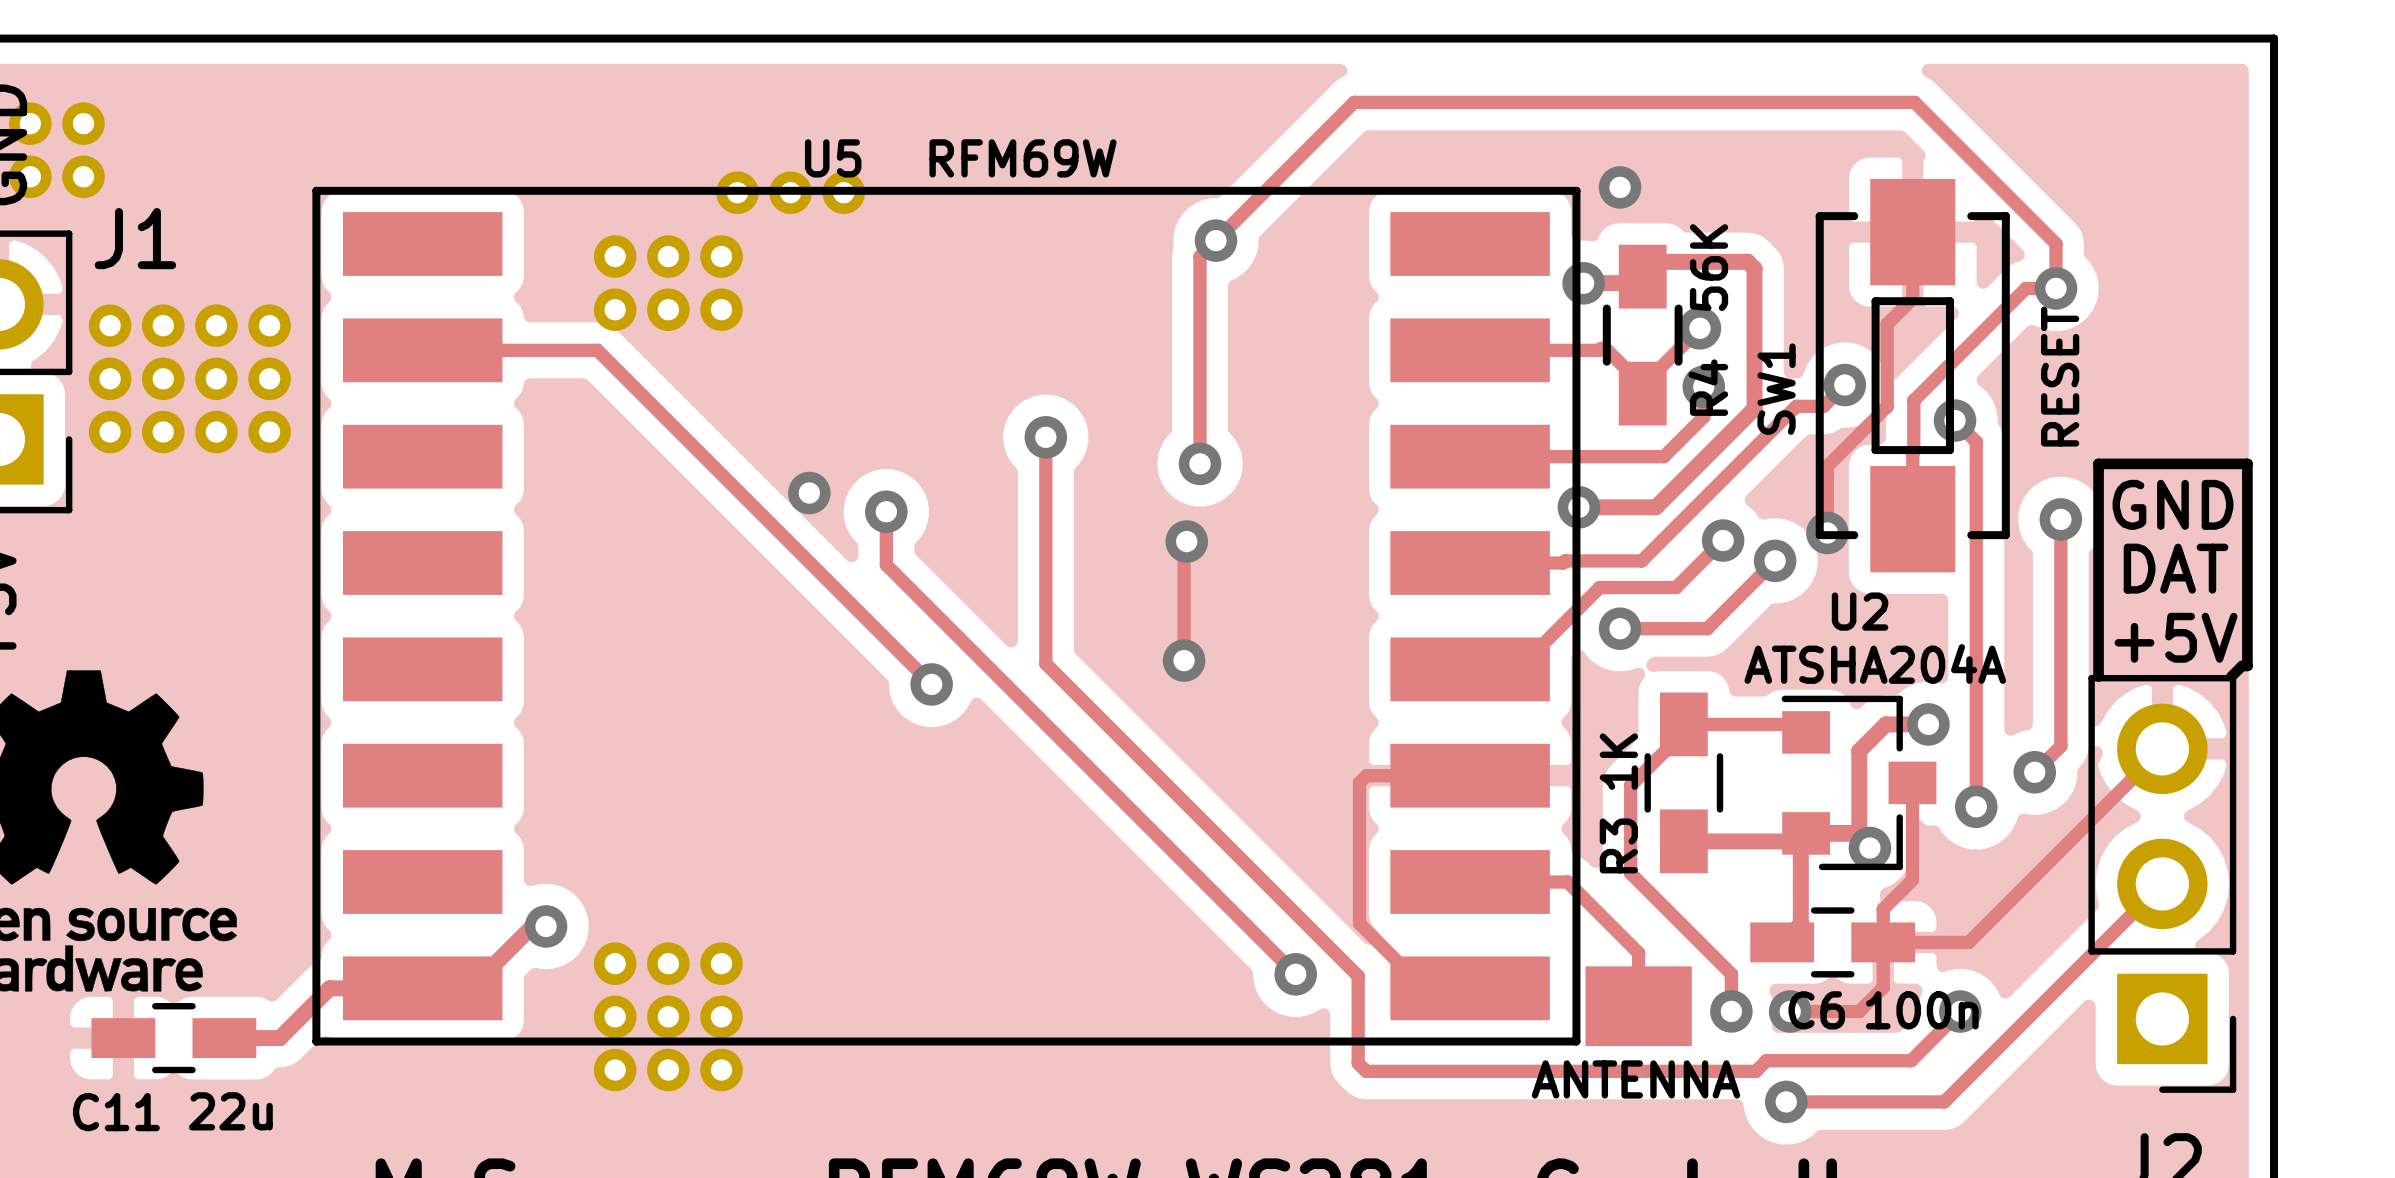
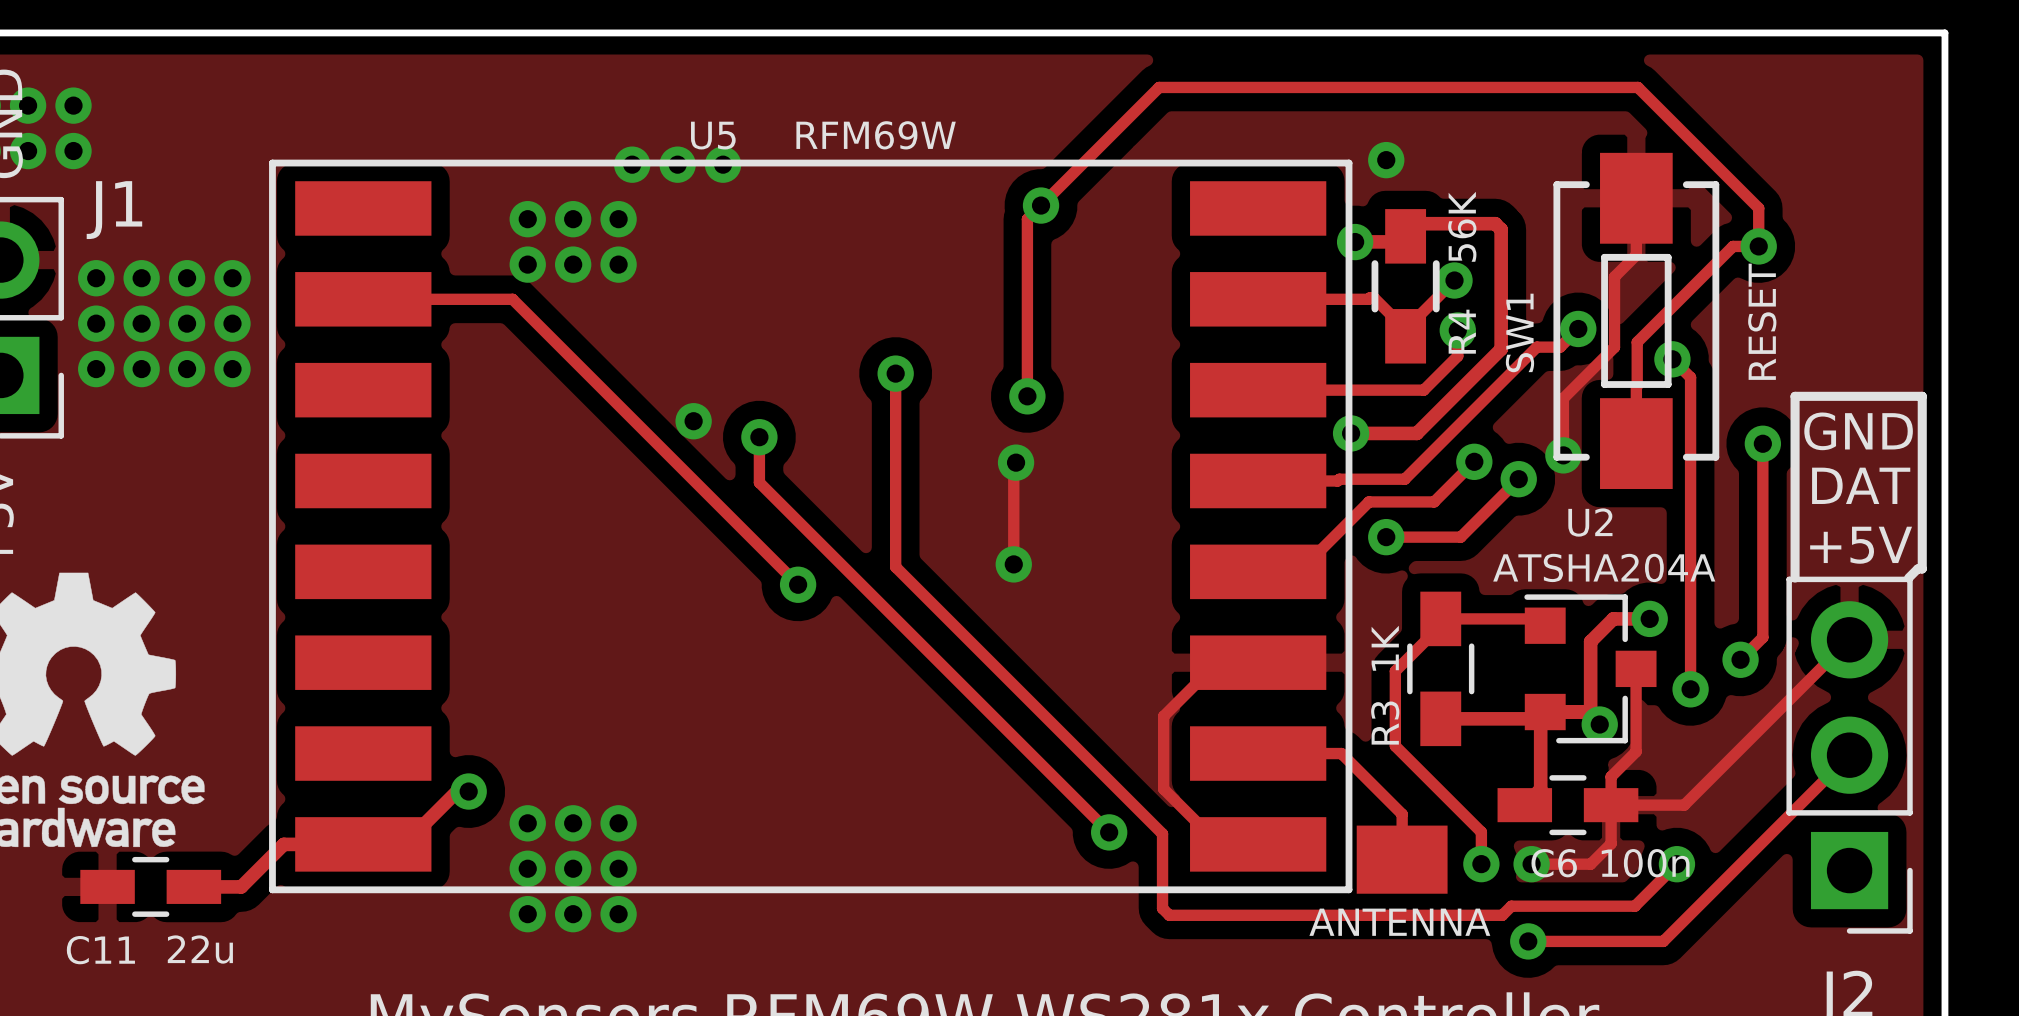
track: (1422, 775) (1366, 775) (1359, 782) (1359, 838) -> (1217, 662) (1163, 716)

